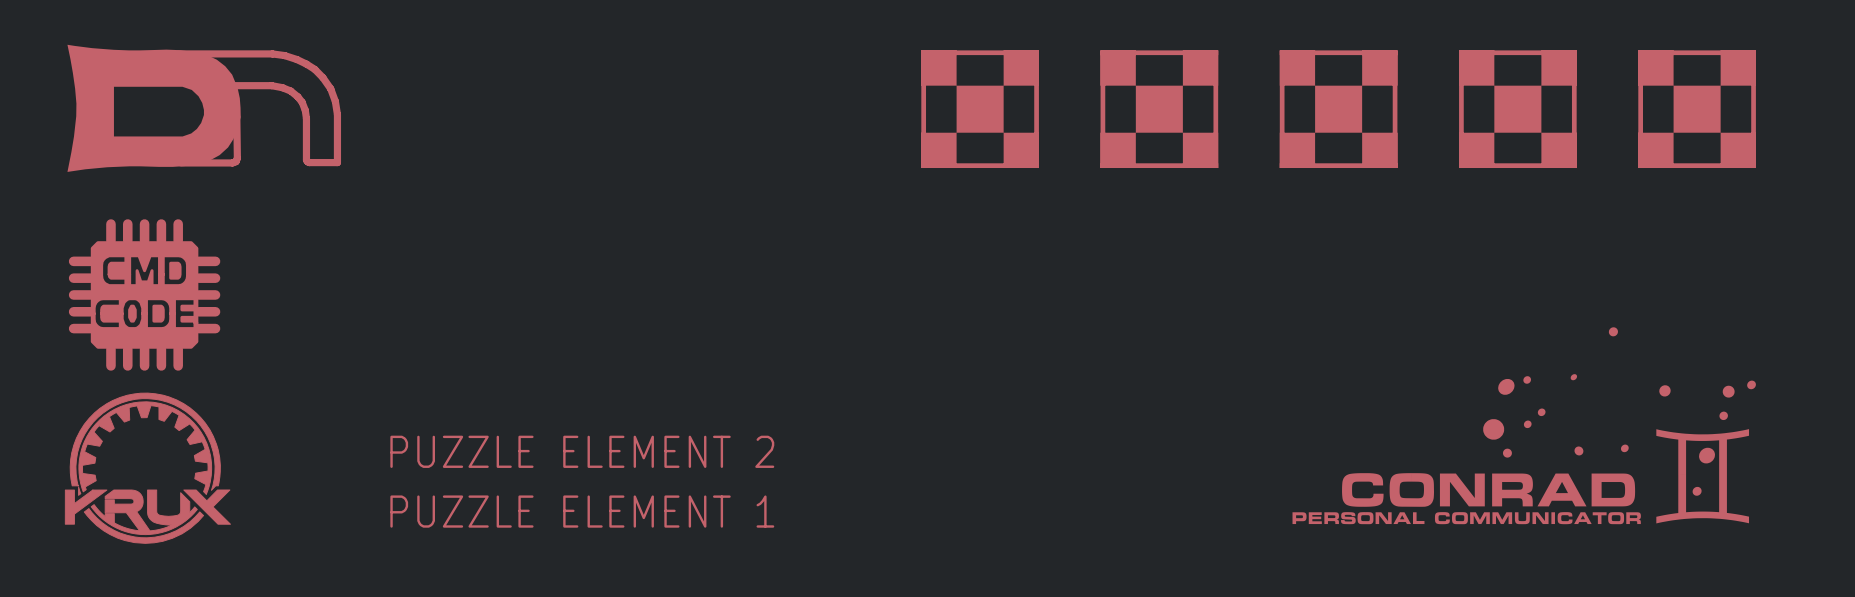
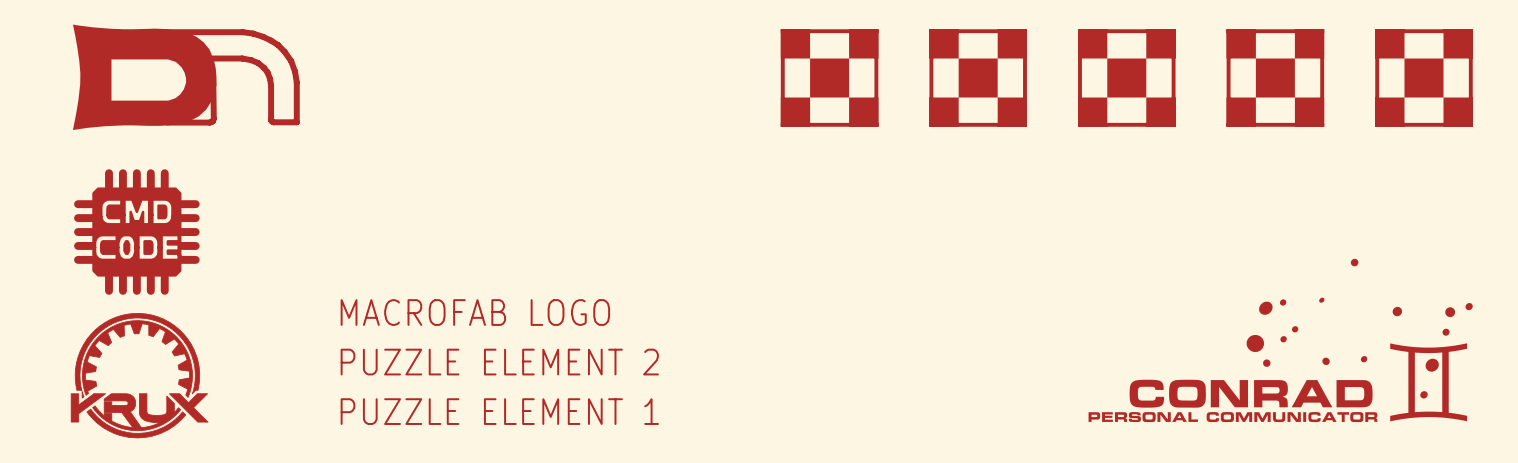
part: none -> (475, 312)

